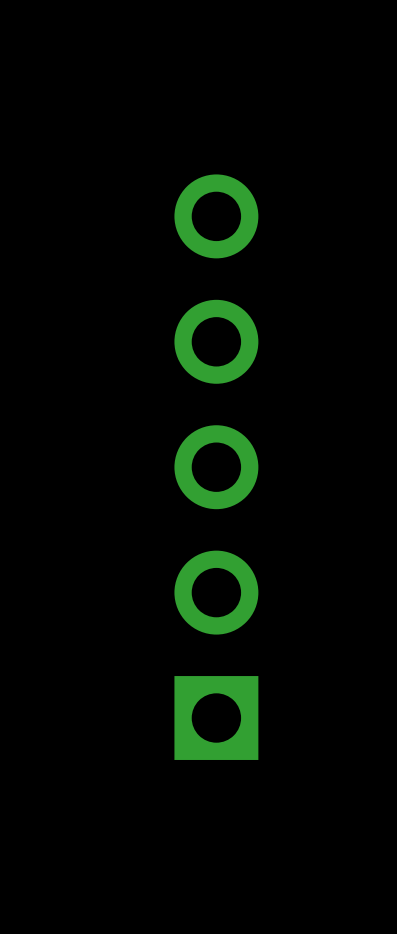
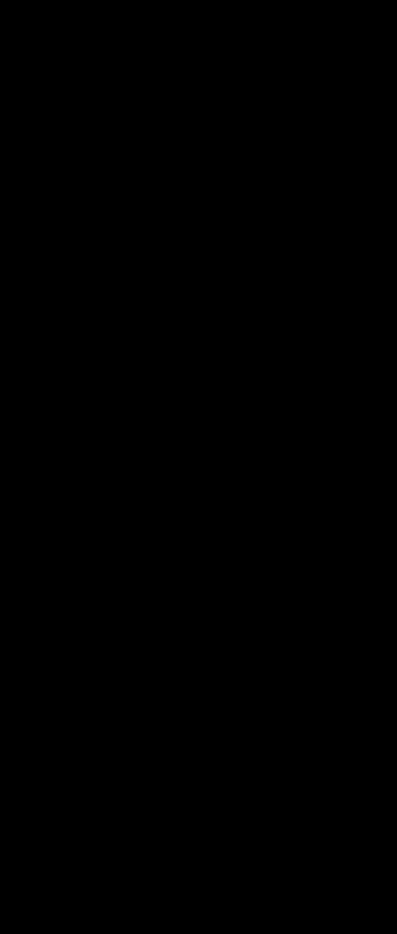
part: (216, 467) -> none

